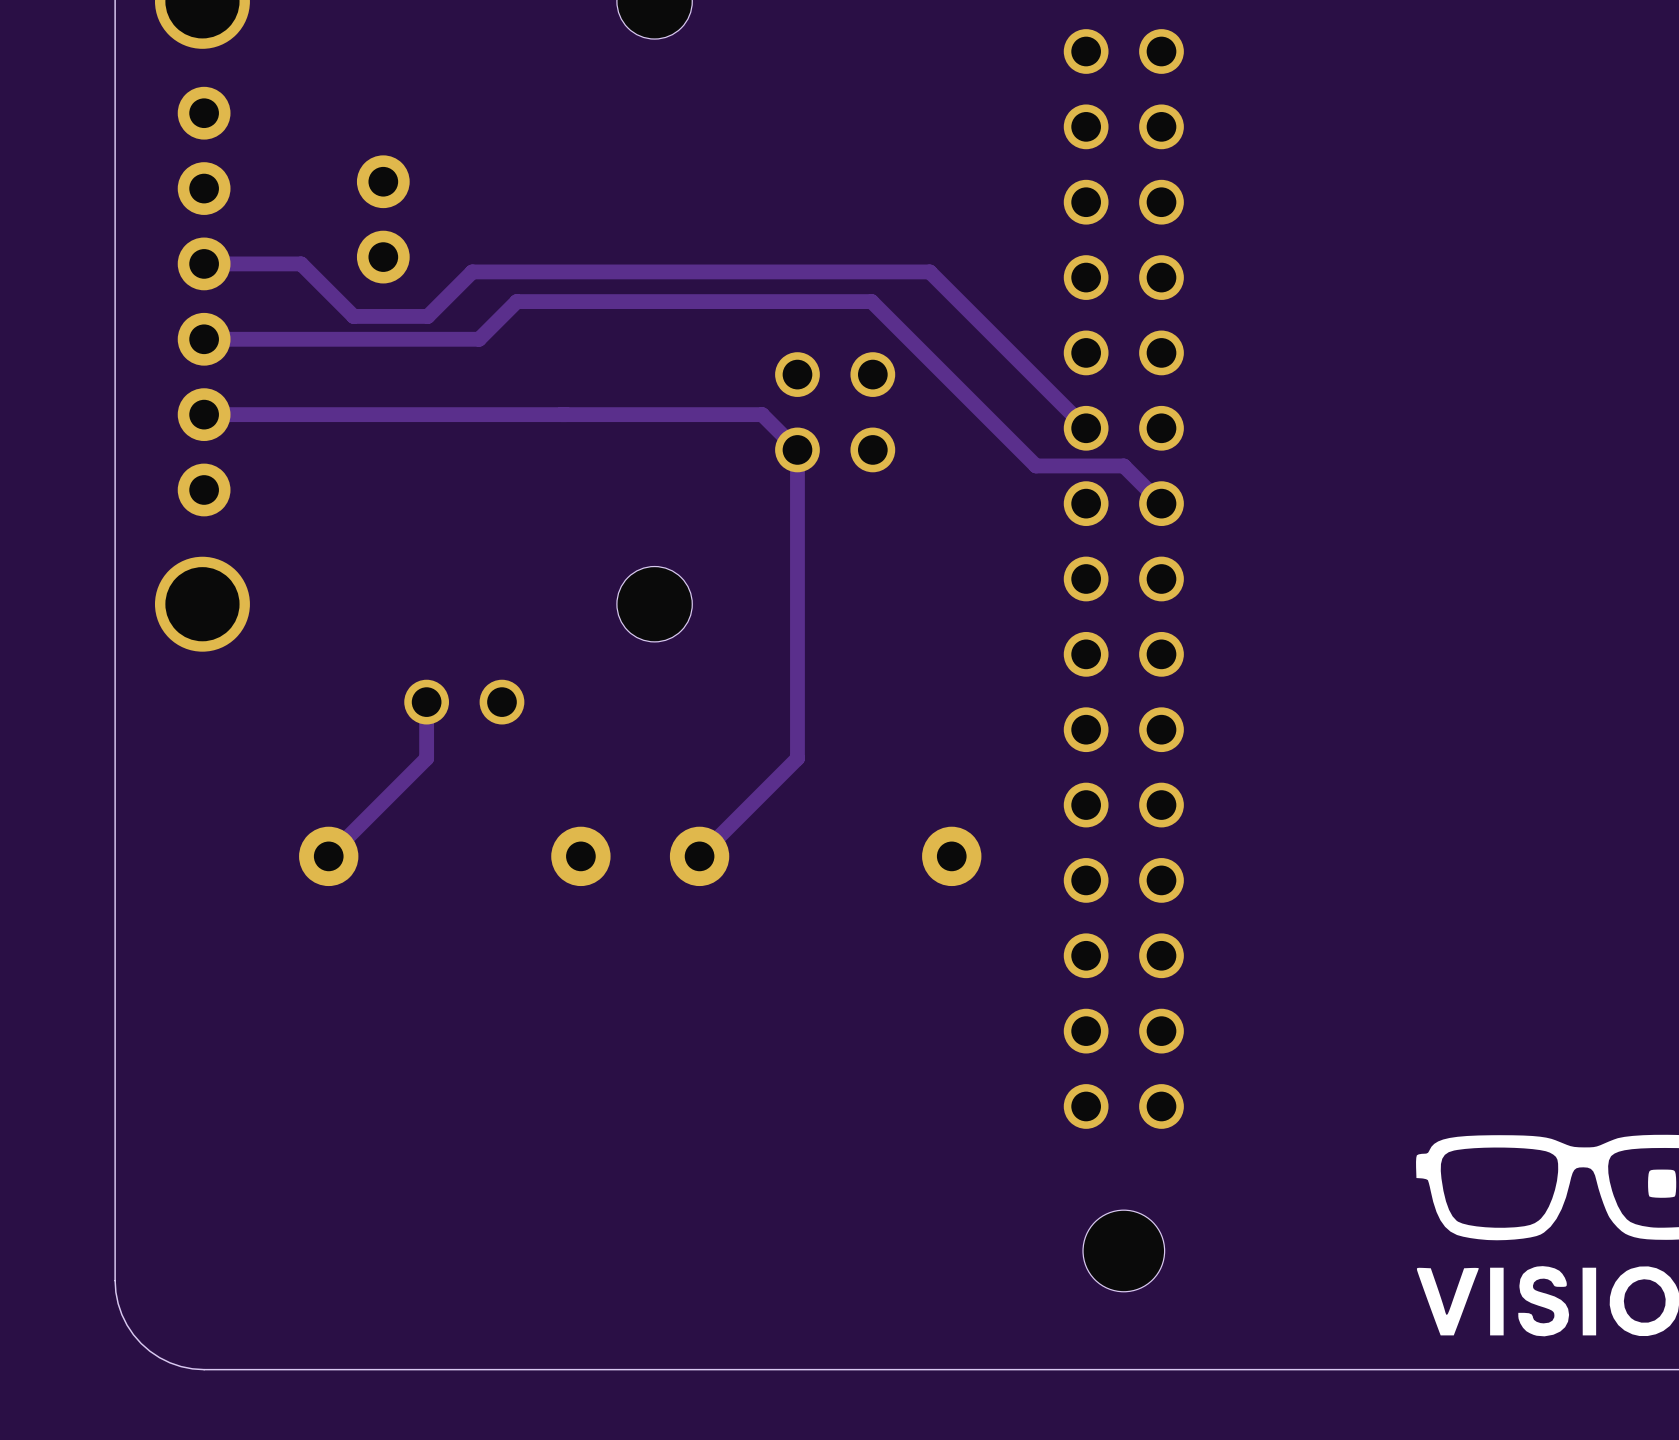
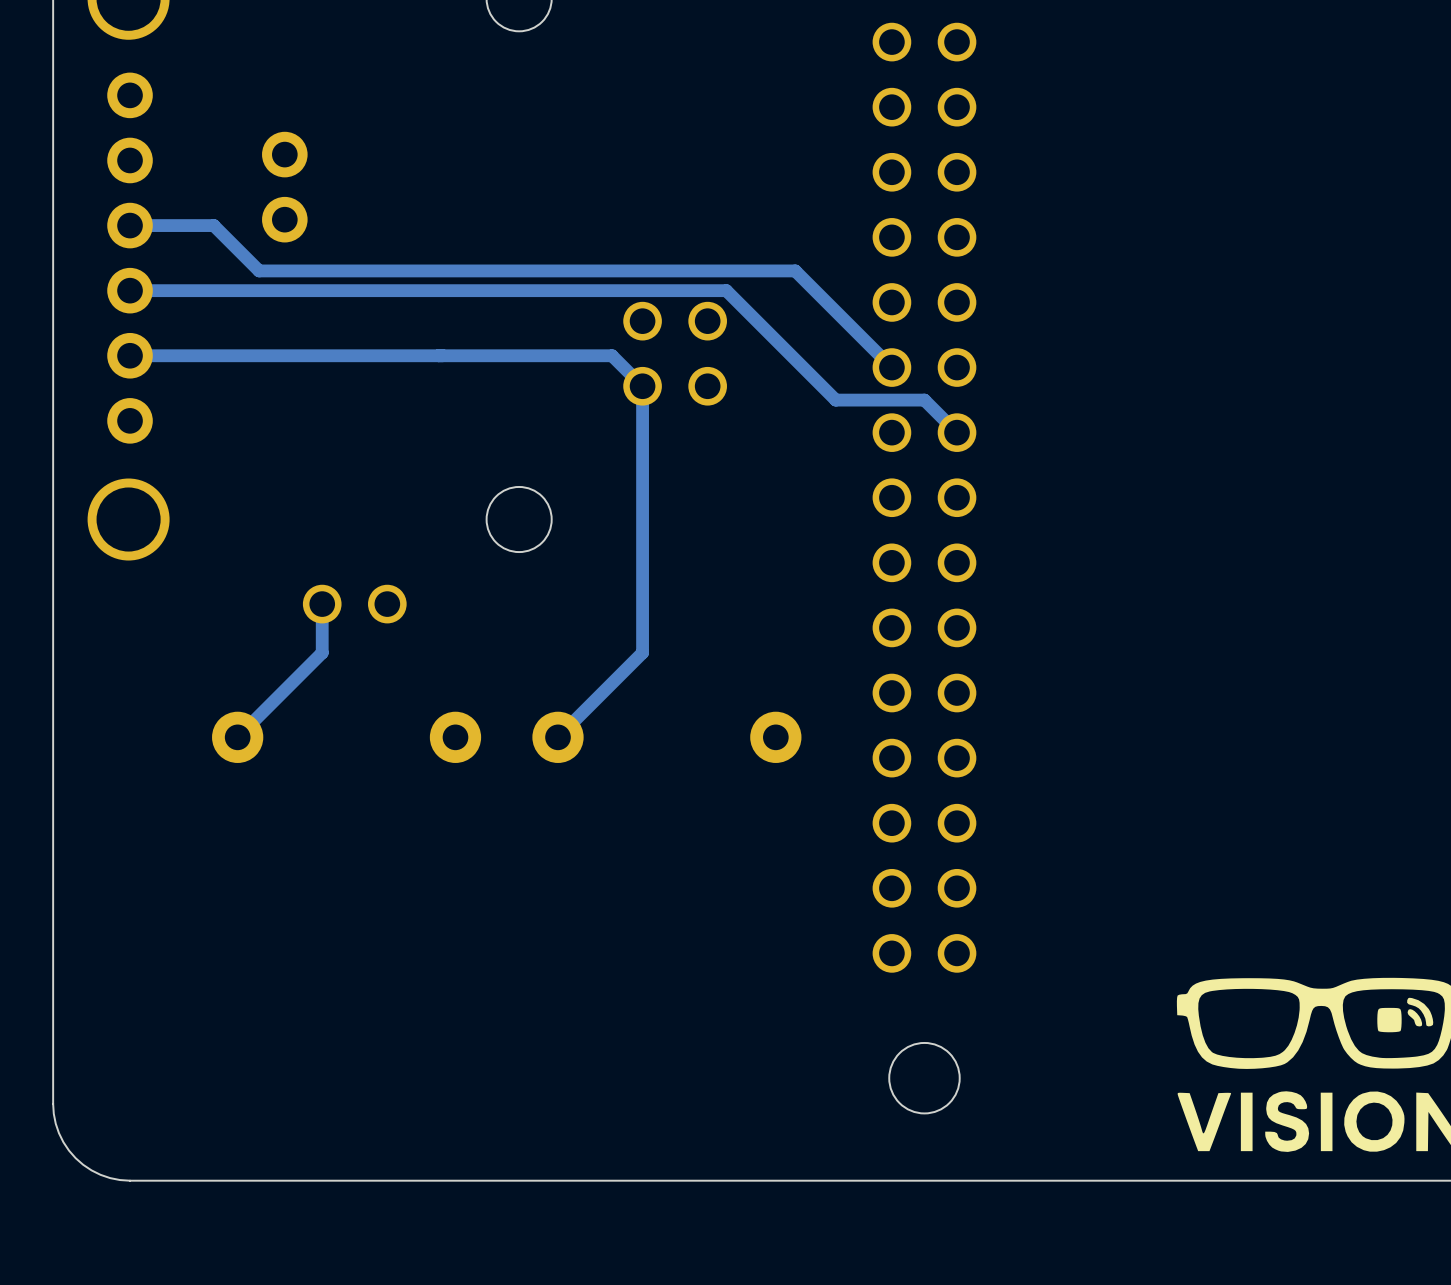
track: (974, 316) (929, 271) (472, 271) (427, 316) -> (795, 270) (323, 270)
track: (479, 339) (516, 301) (871, 301) (1036, 465) -> (367, 290) (726, 290) (835, 400) (848, 400)

